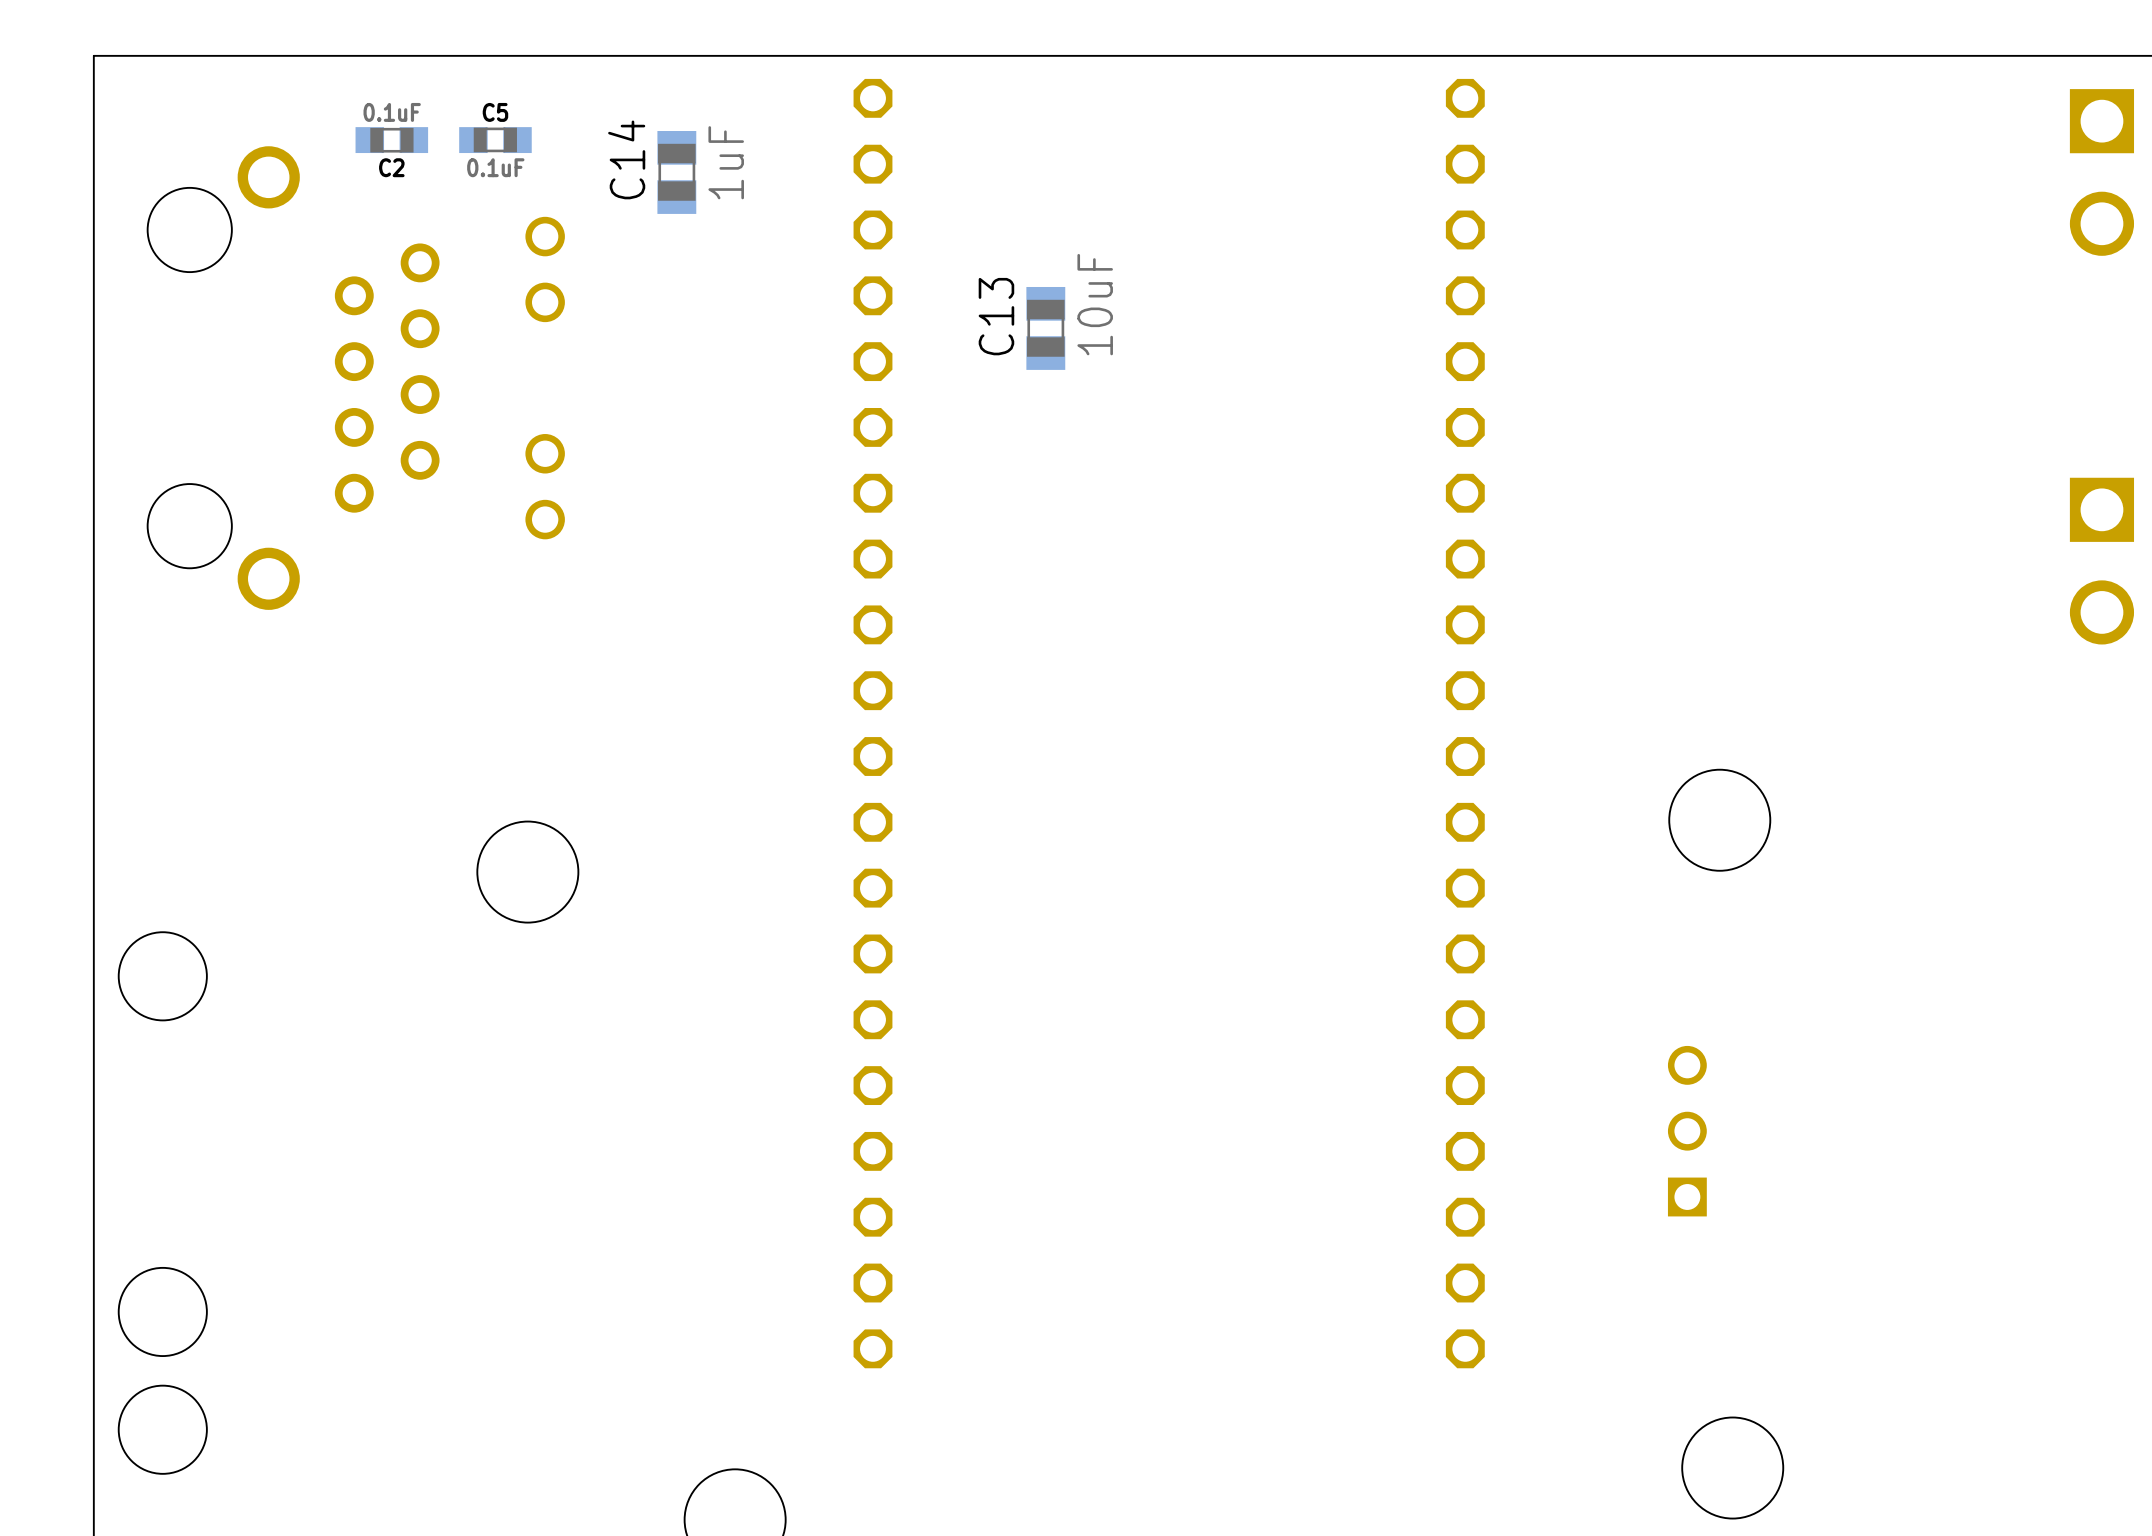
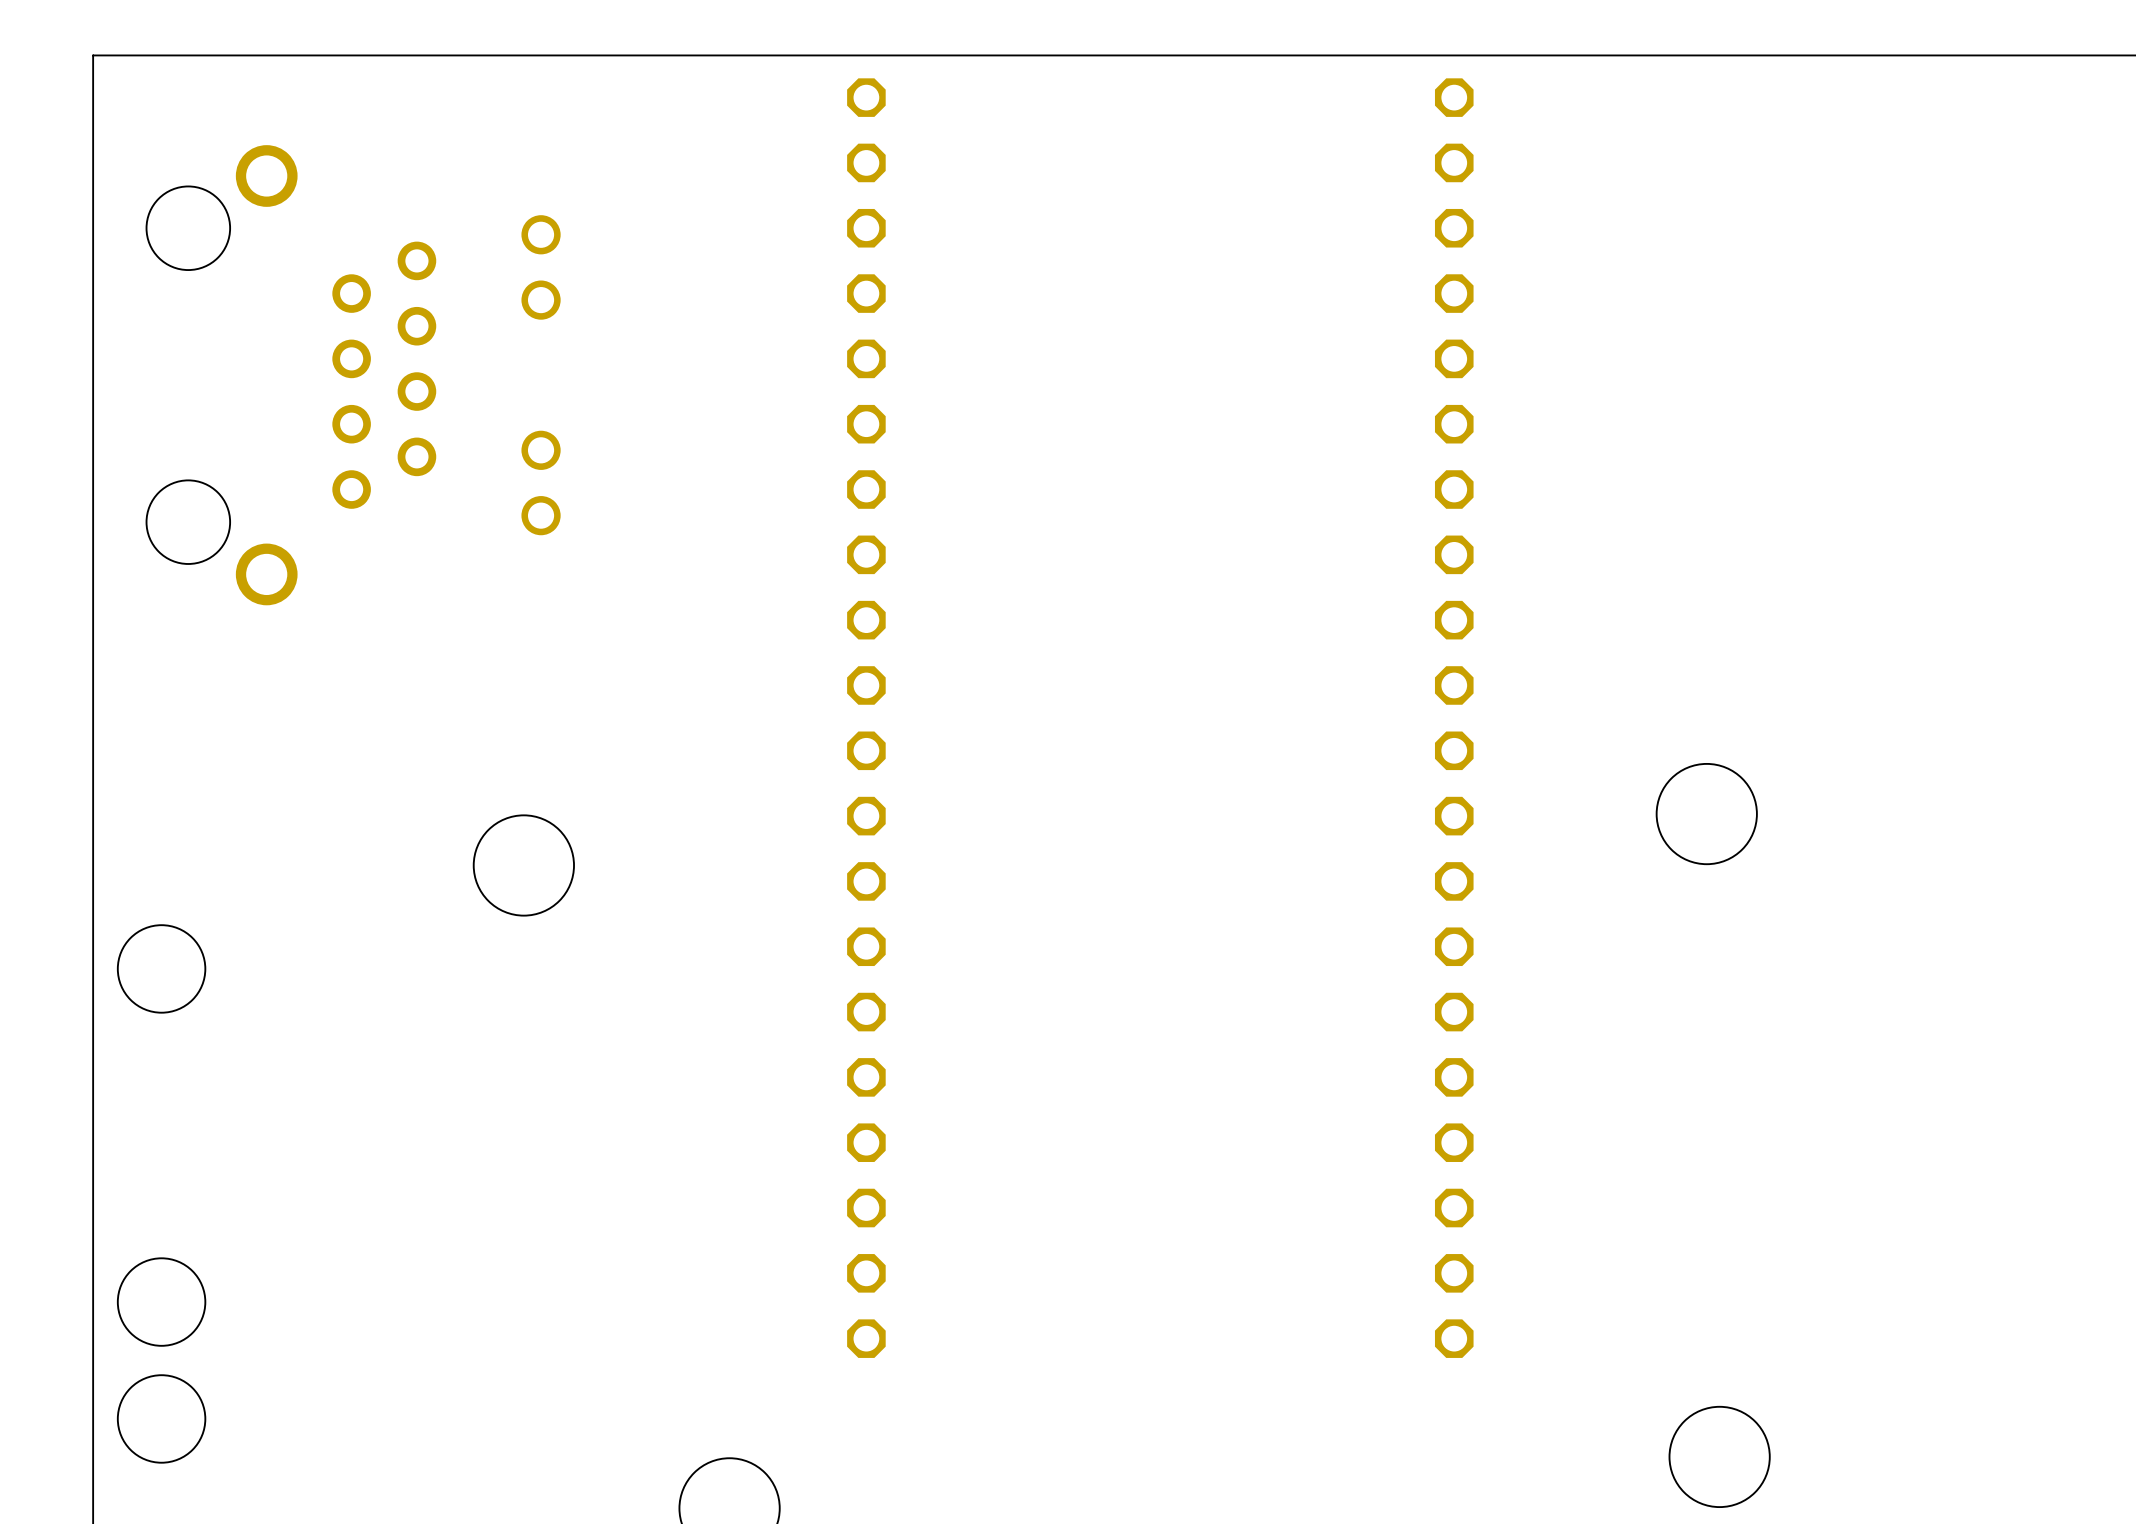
C2: 0.1uF (391, 140) -> none
C5: 0.1uF (495, 140) -> none
C14: 1uF (676, 172) -> none
part: (2101, 172) -> none
C13: 10uF (1045, 328) -> none
part: (2101, 561) -> none
part: (1687, 1131) -> none

